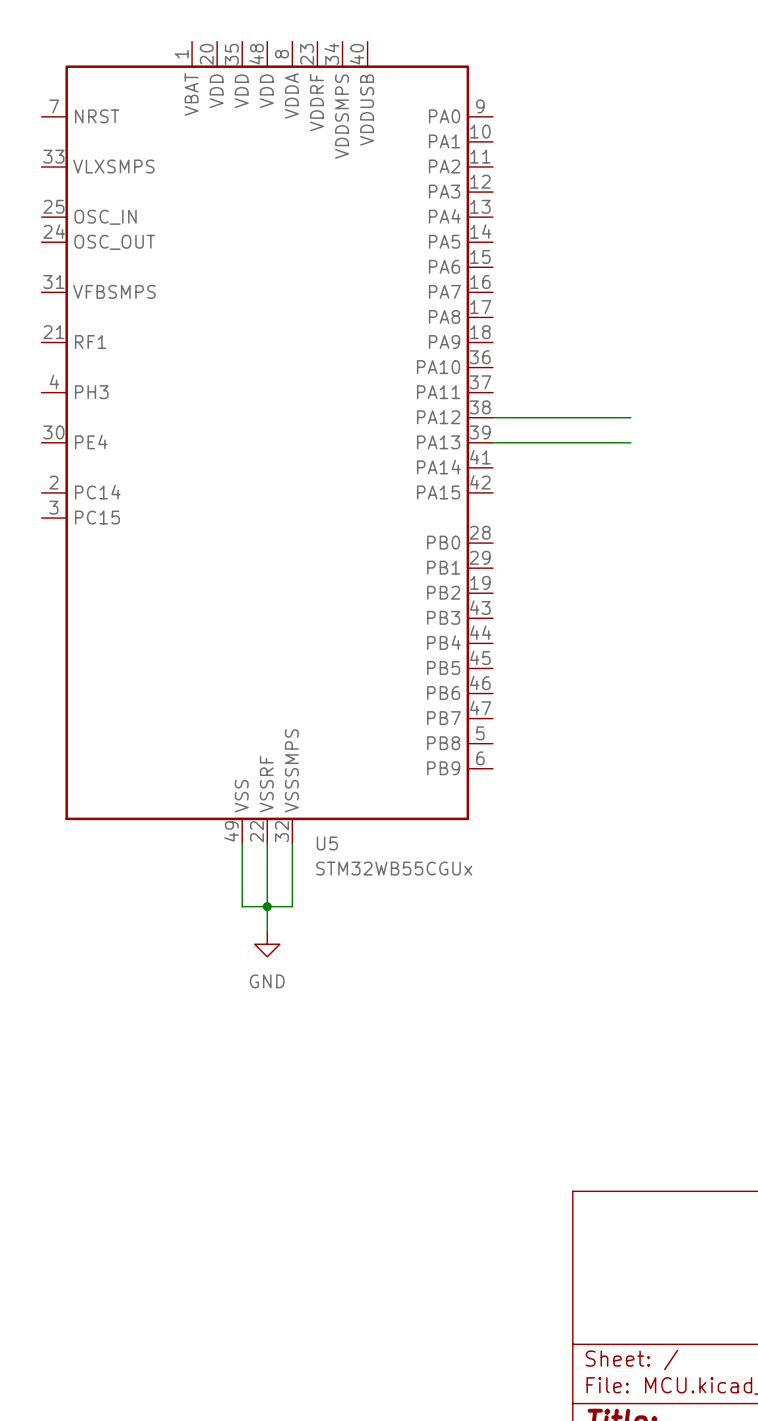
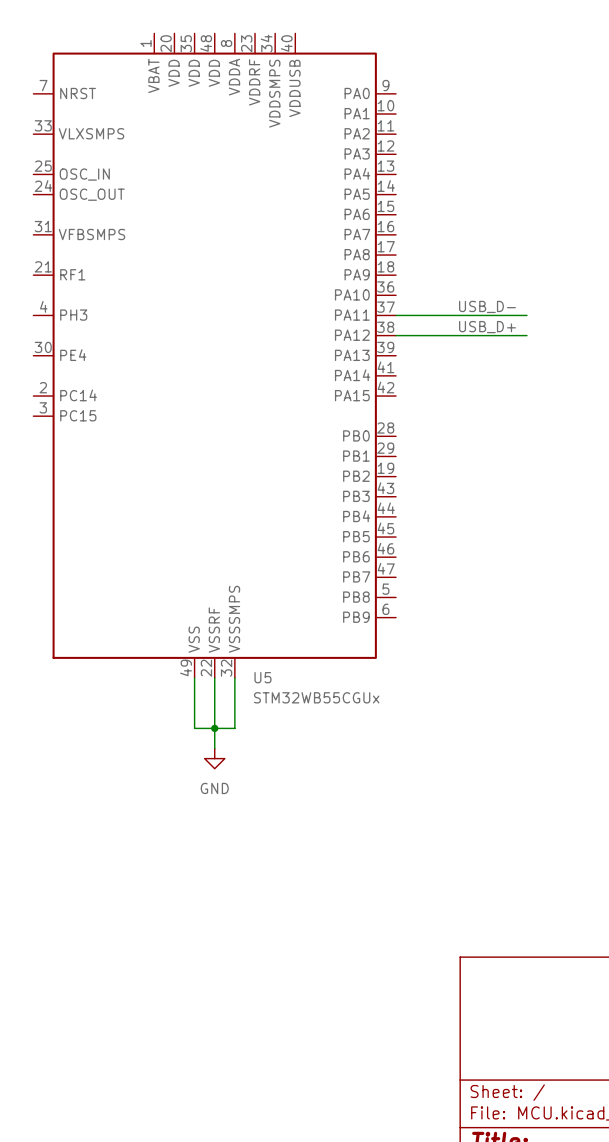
label: none -> USB_D- (487, 306)
wire: none -> (396, 315) (526, 315)
label: none -> USB_D+ (487, 327)
wire: none -> (506, 335) (526, 335)
wire: (492, 442) (630, 442) -> none

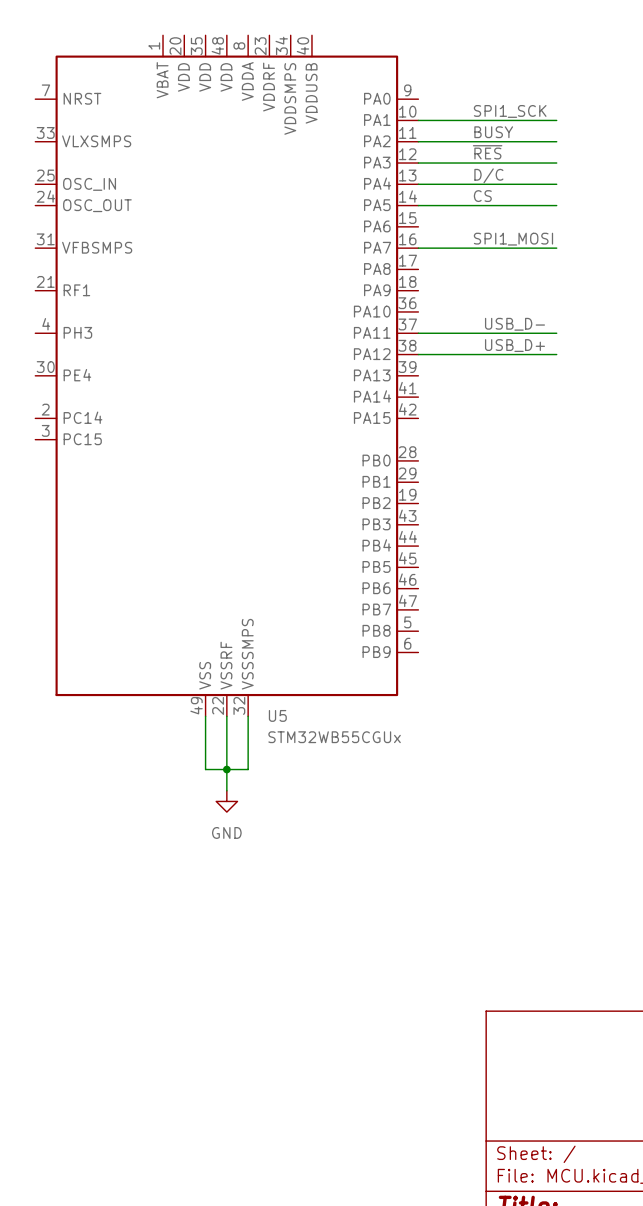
label: none -> SPI1_SCK (510, 111)
wire: none -> (418, 120) (556, 120)
label: none -> BUSY (493, 132)
wire: none -> (418, 141) (556, 141)
label: none -> ~{RES} (487, 152)
wire: none -> (418, 163) (556, 163)
label: none -> D/C (488, 175)
wire: none -> (418, 184) (556, 184)
label: none -> CS (482, 196)
wire: none -> (418, 205) (556, 205)
label: none -> SPI1_MOSI (513, 239)
wire: none -> (418, 248) (556, 248)

